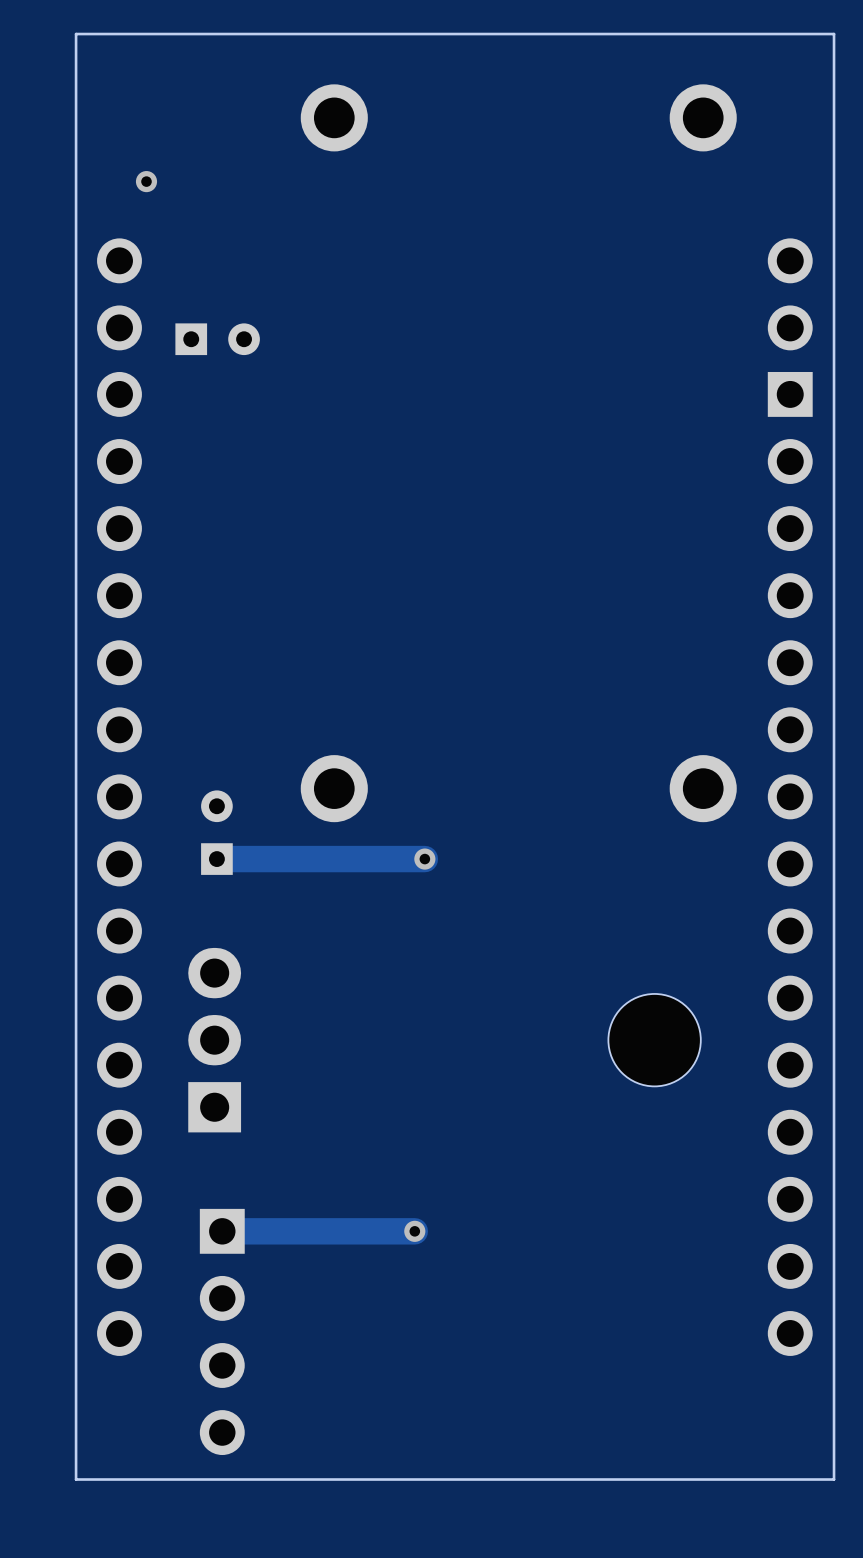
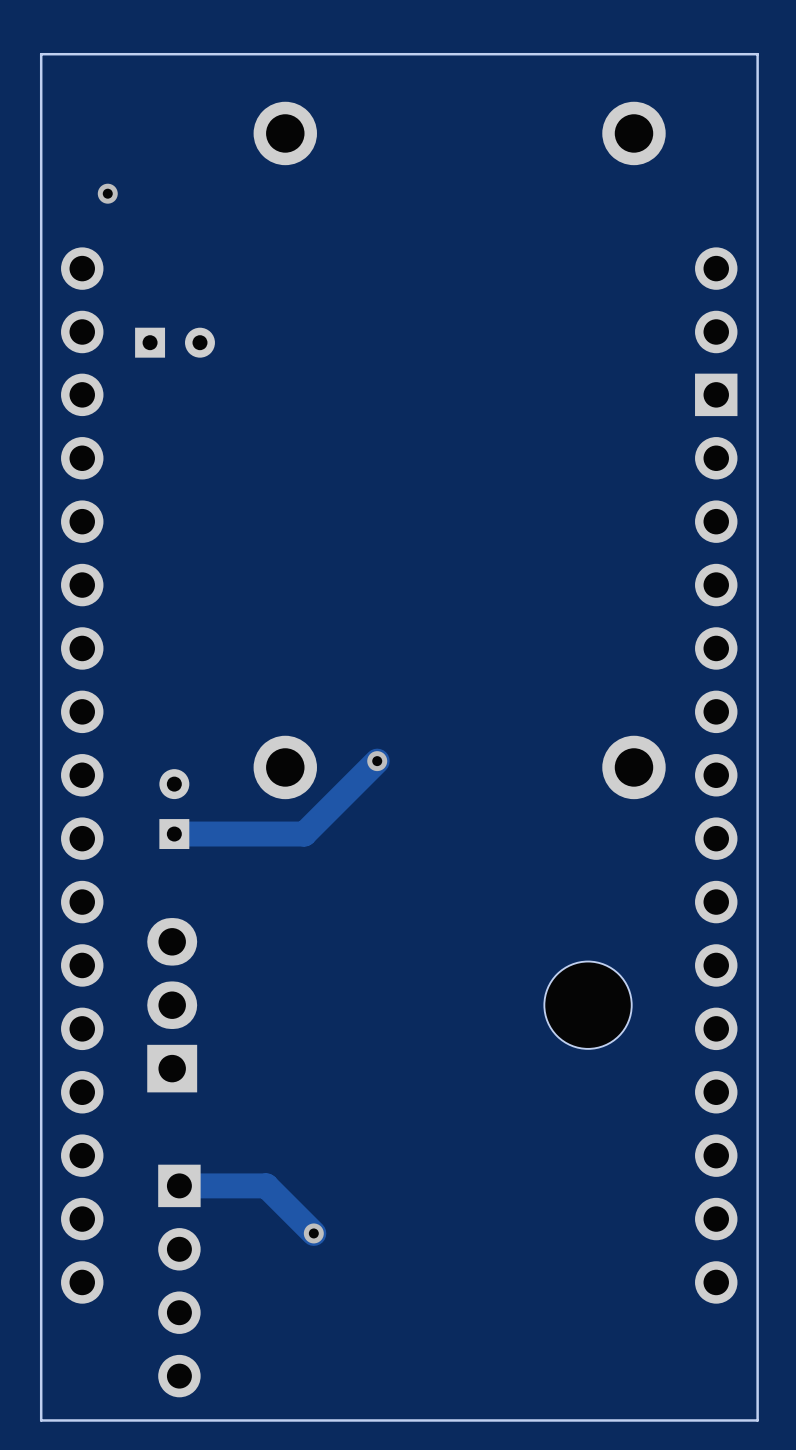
track: (424, 859) (354, 859) -> (377, 761) (304, 834)
via position: (424, 859) -> (377, 761)
track: (414, 1231) (314, 1231) -> (313, 1233) (266, 1185)
via position: (414, 1231) -> (313, 1233)

